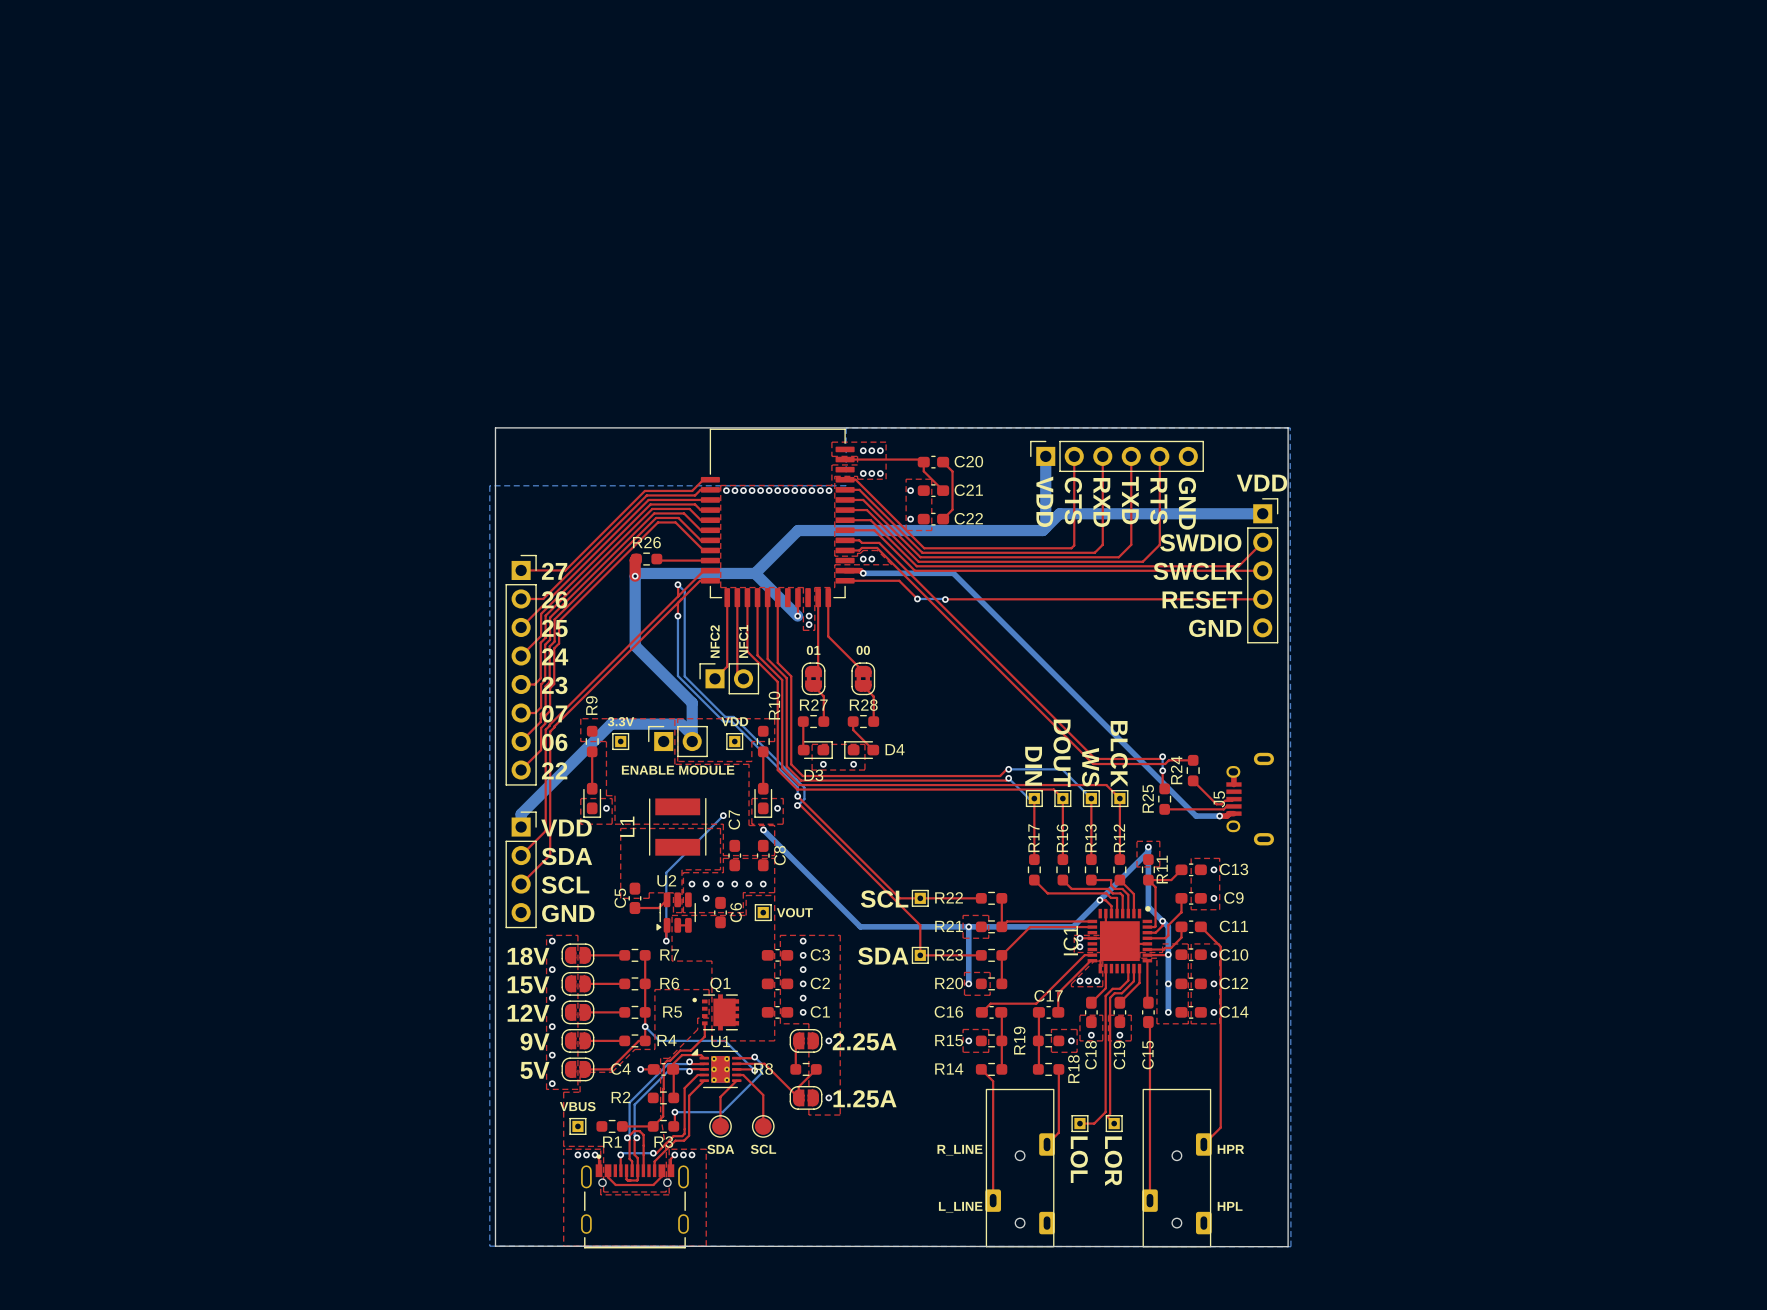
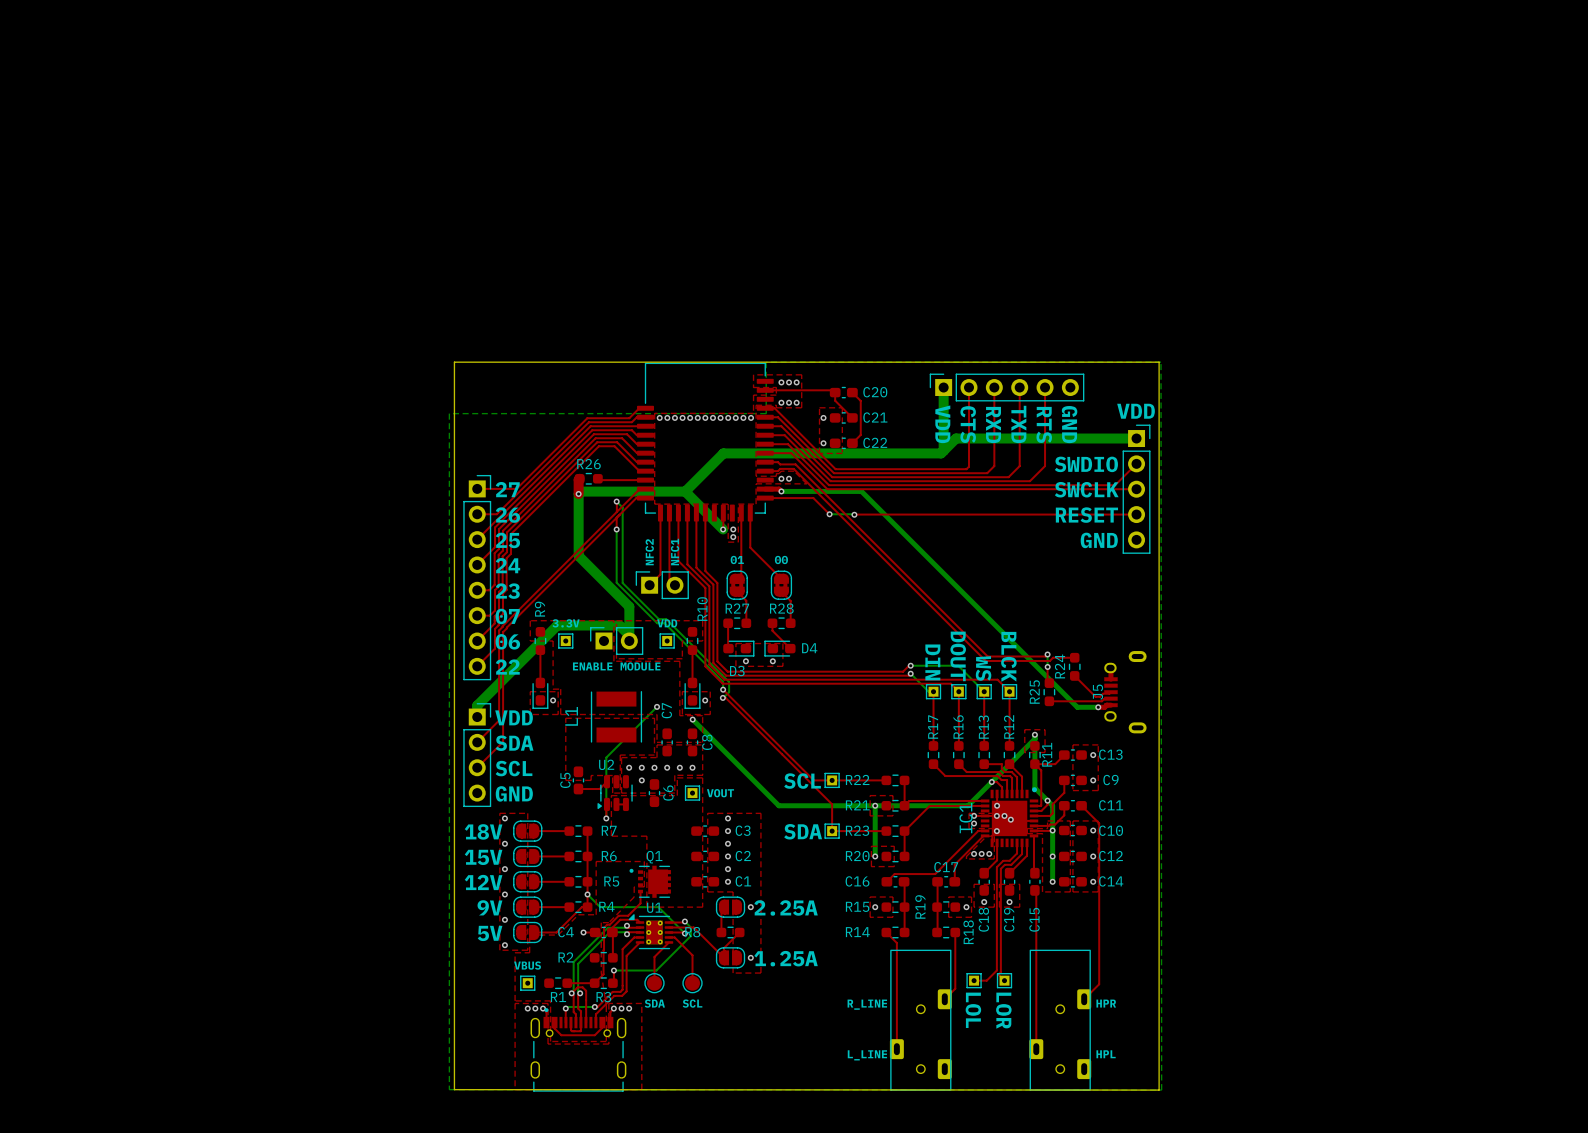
via: none -> (997, 805)
via: none -> (996, 815)
via: none -> (1004, 815)
via: none -> (1010, 819)
via: none -> (996, 831)

